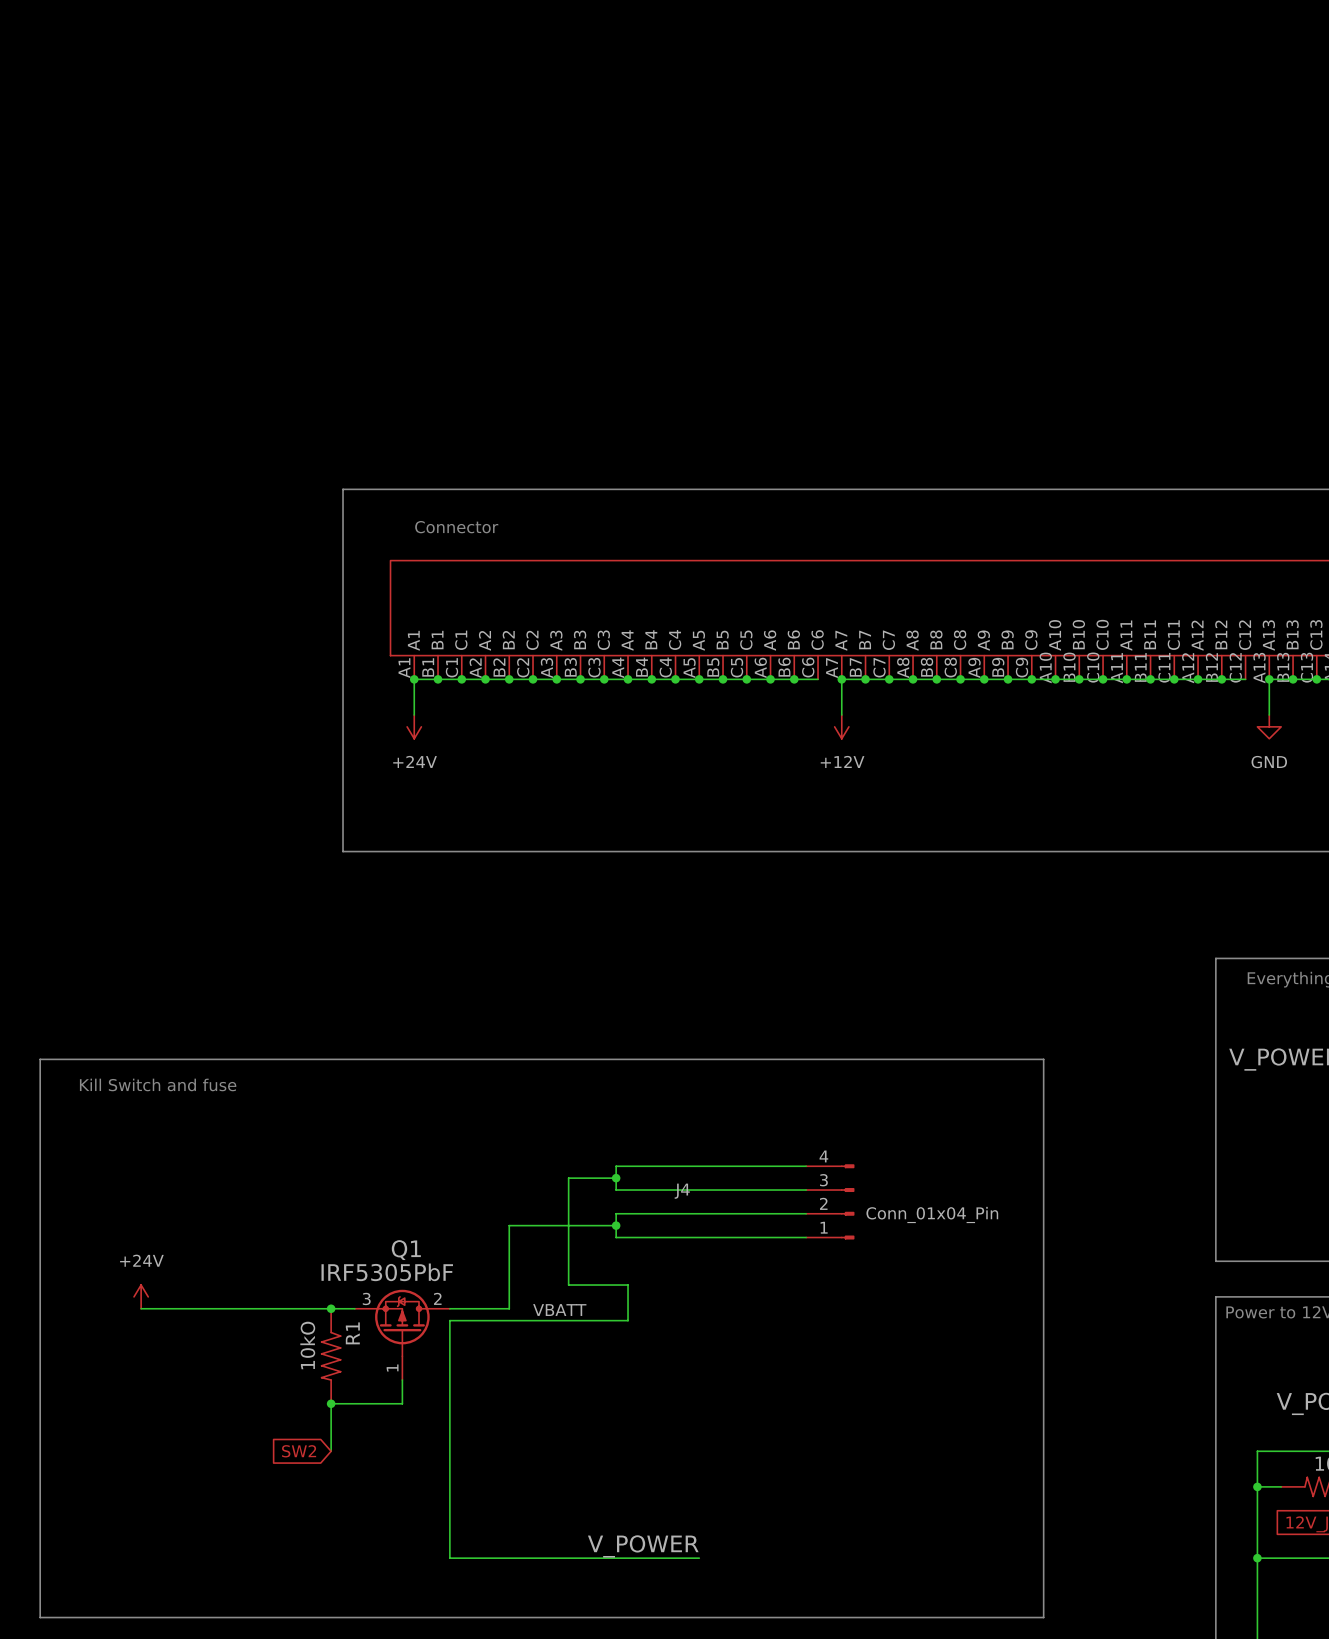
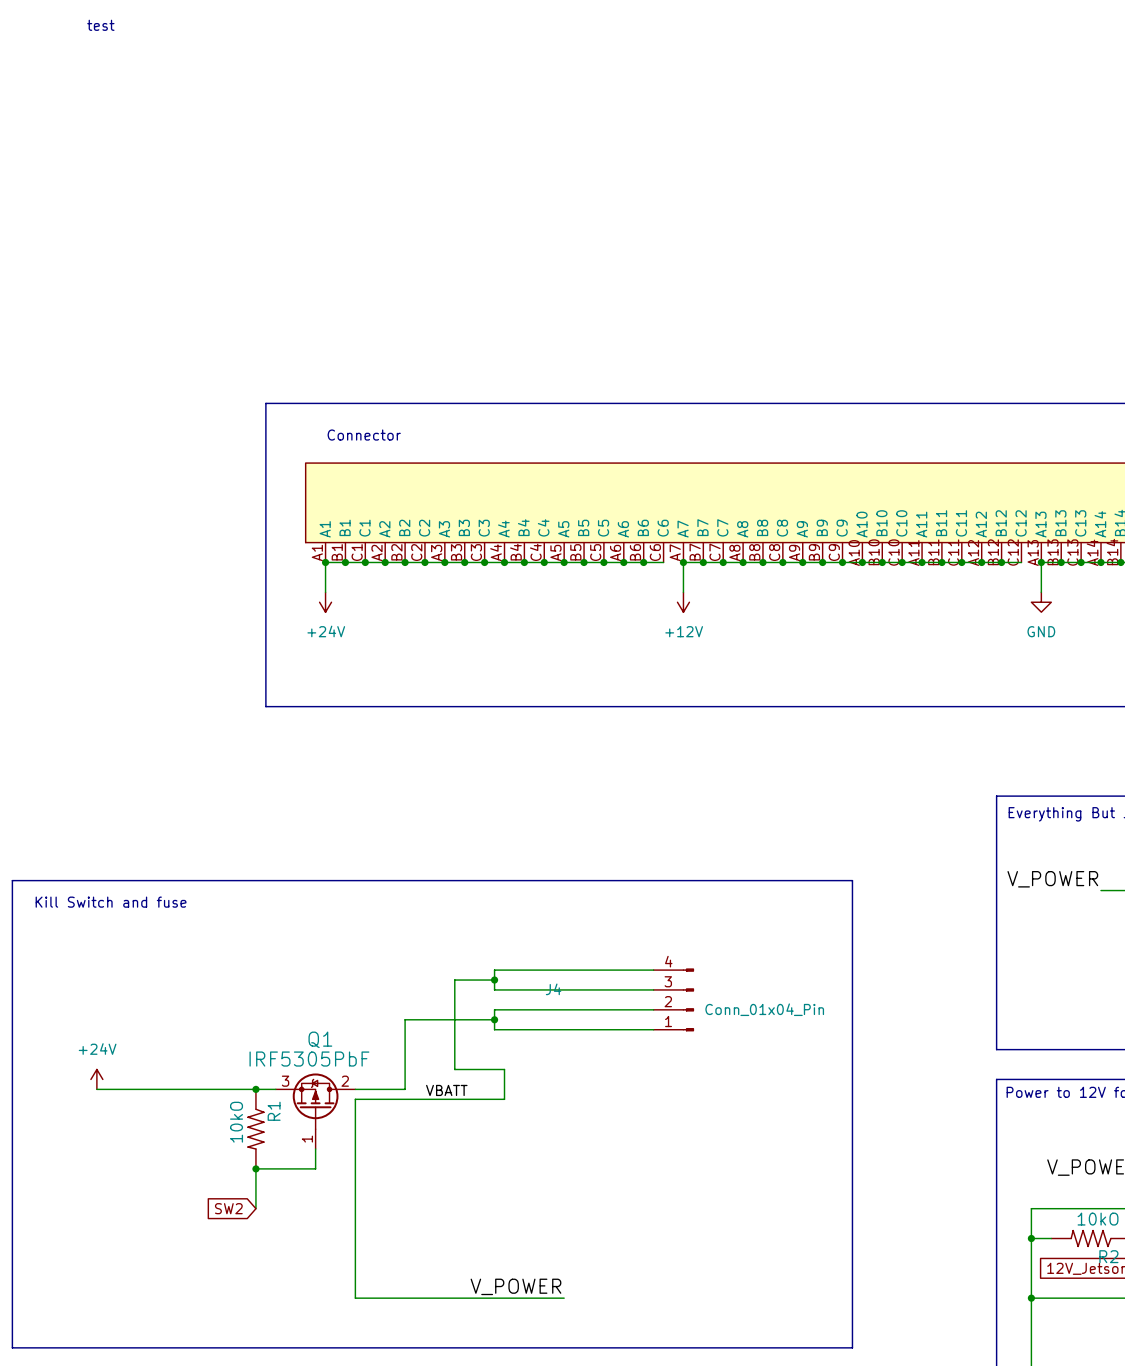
text: none -> test (100, 25)

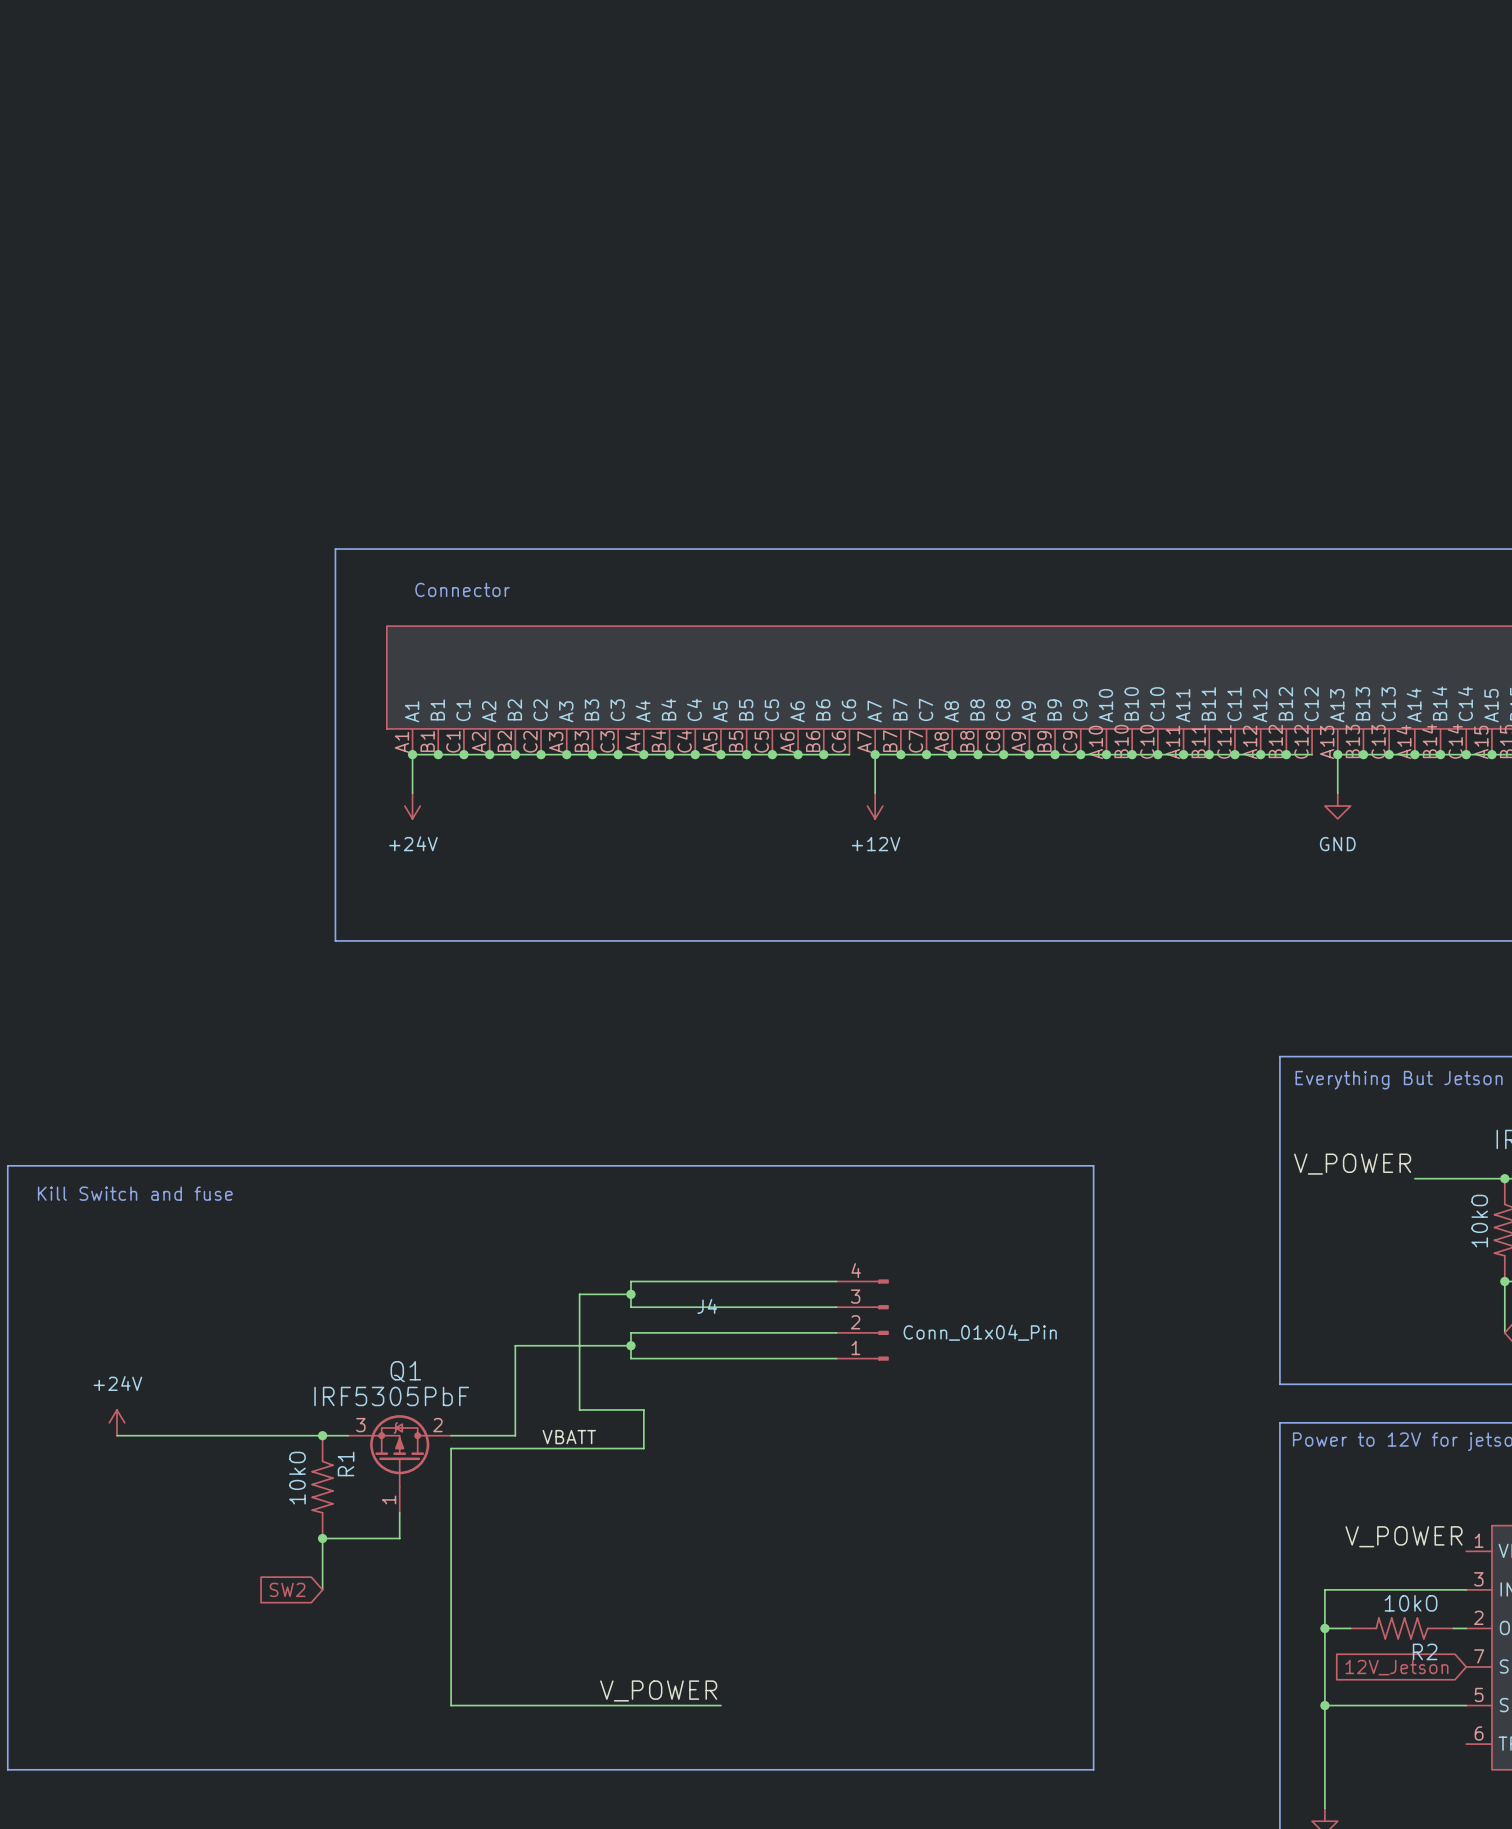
text: test (100, 25) -> none

